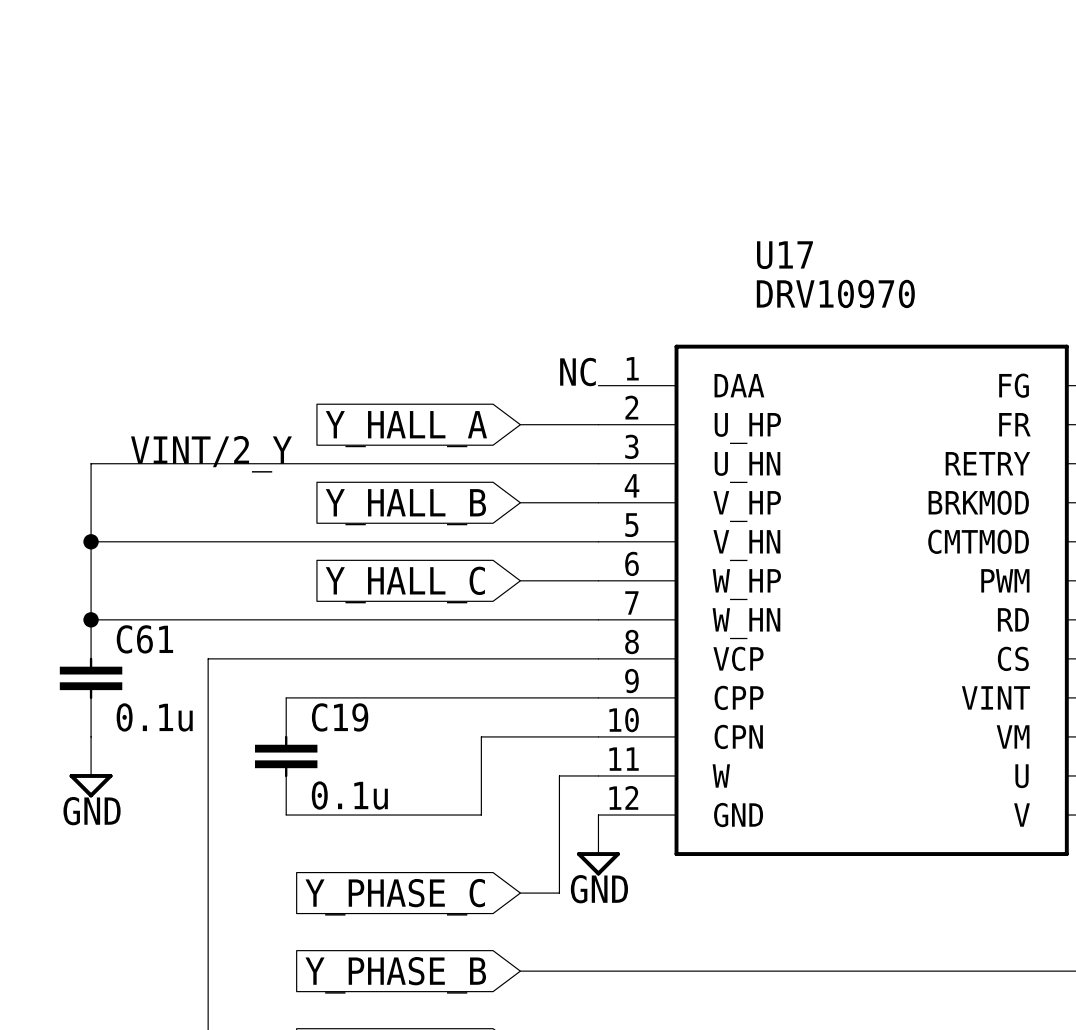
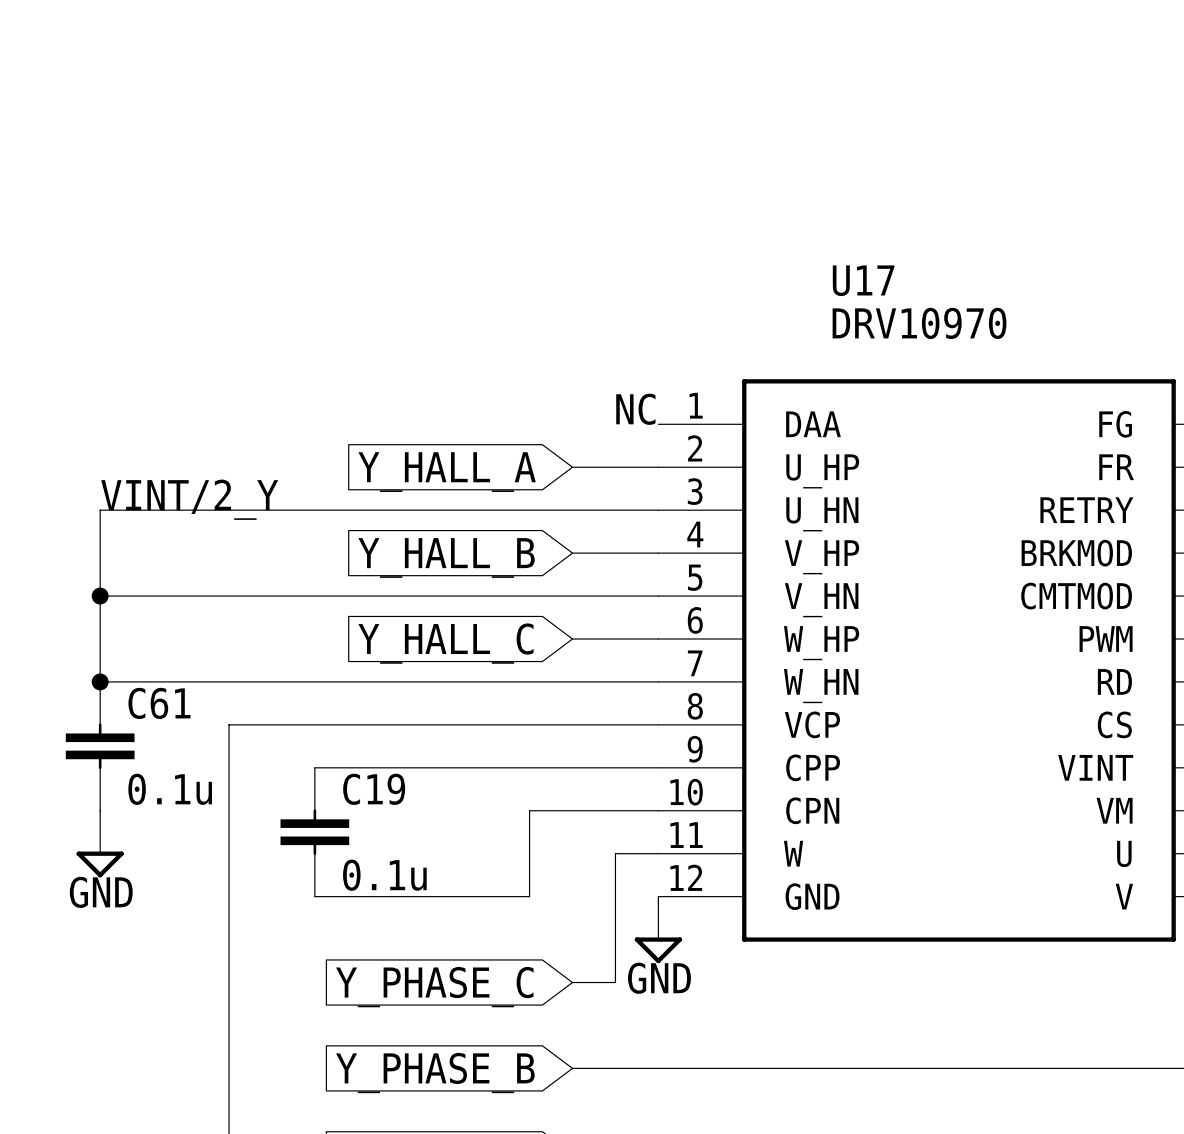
label position: VINT/2_Y (211, 454) -> VINT/2_Y (189, 499)

